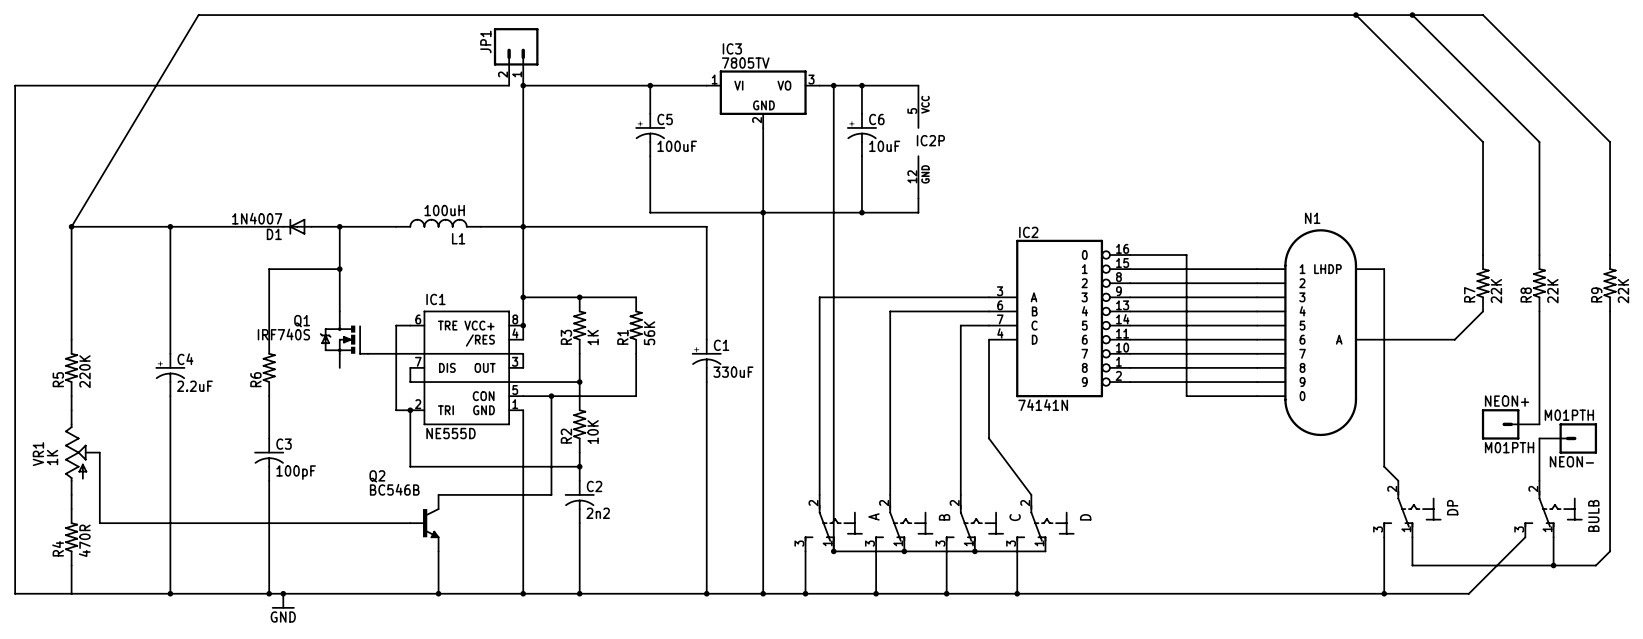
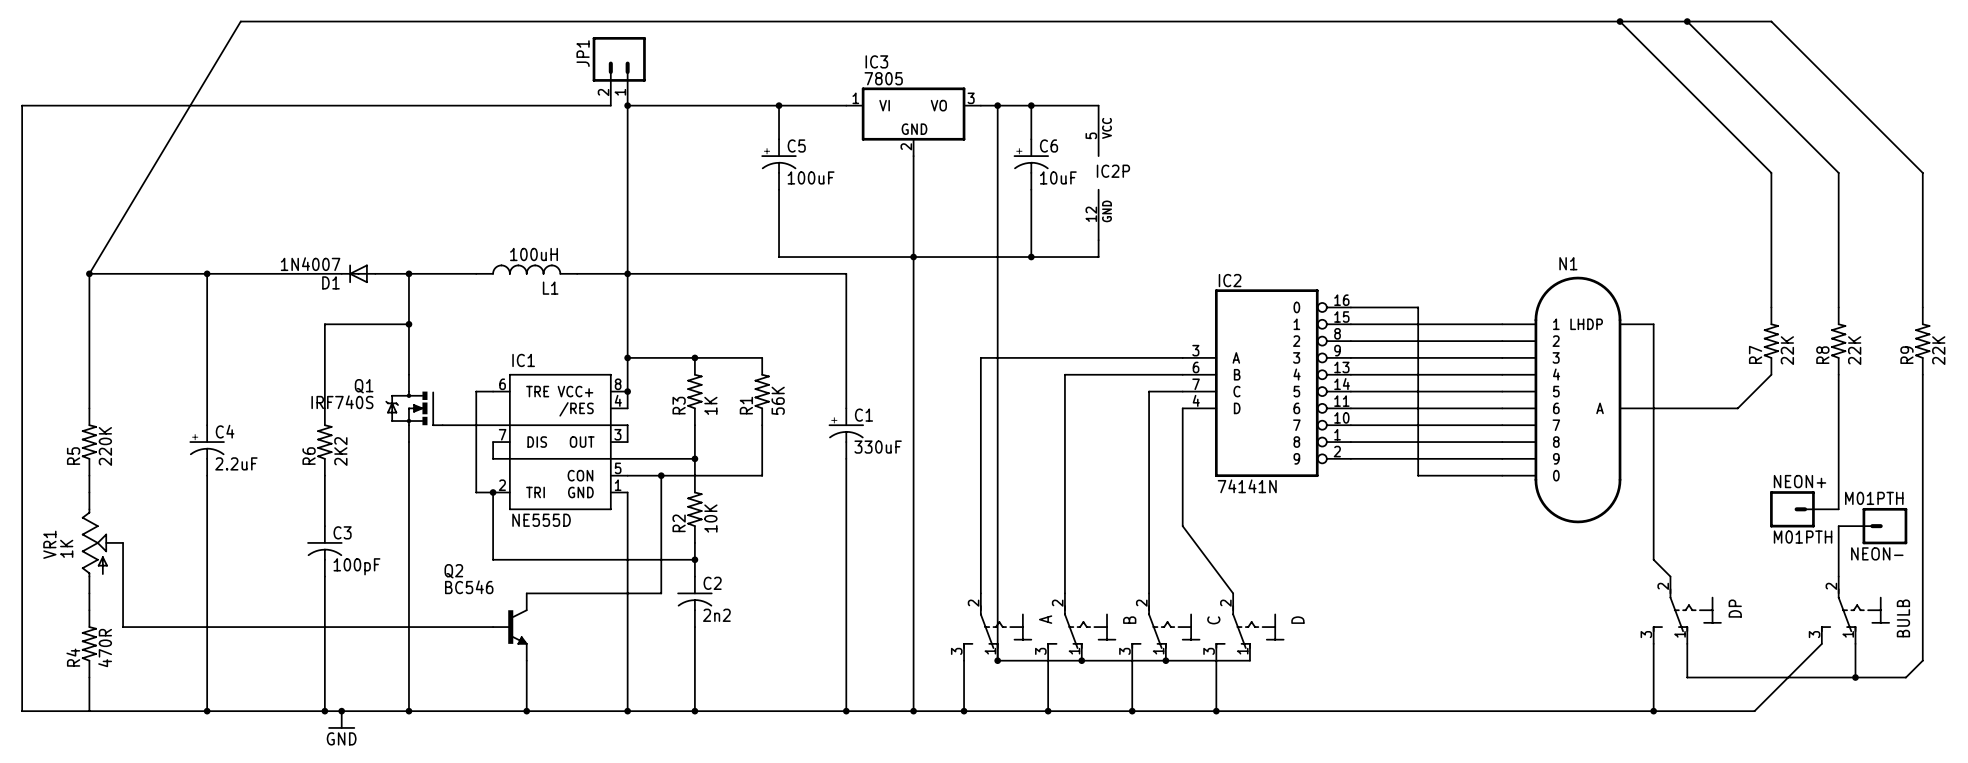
IC3 value: 7805TV (745, 63) -> 7805 (883, 78)
wire: none -> (408, 442) (408, 711)
R6 value: none -> 2K2 (340, 451)
Q2 value: BC546B (394, 489) -> BC546 (469, 587)
junction: none -> (408, 711)

